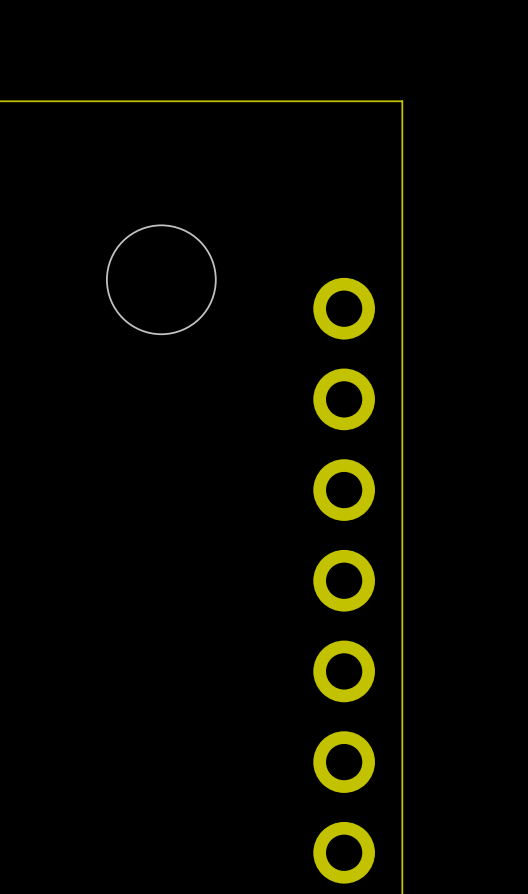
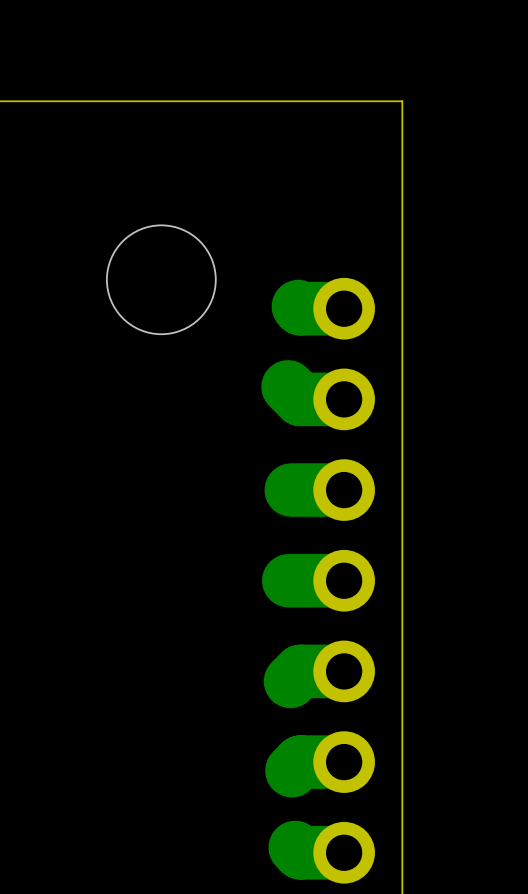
track: none -> (298, 306) (300, 308) (344, 308)
track: none -> (288, 386) (300, 399) (344, 399)
track: none -> (344, 490) (291, 490)
track: none -> (344, 580) (288, 580)
track: none -> (344, 671) (300, 671) (290, 681)
track: none -> (344, 762) (300, 762) (291, 770)
track: none -> (295, 847) (300, 852) (344, 852)

